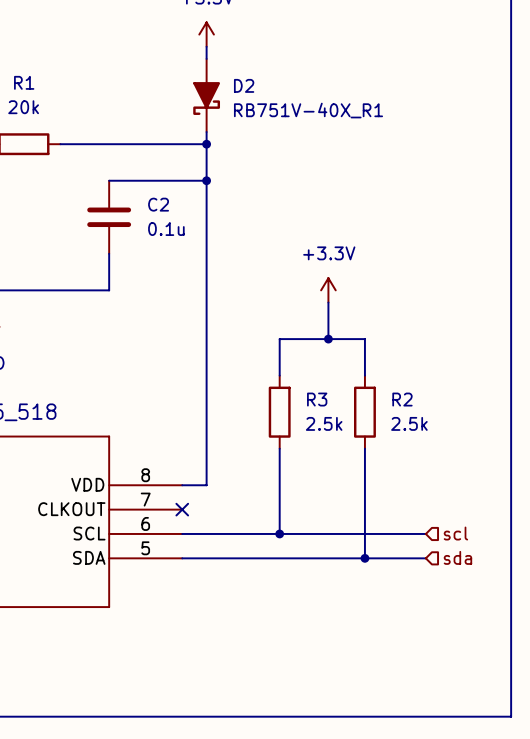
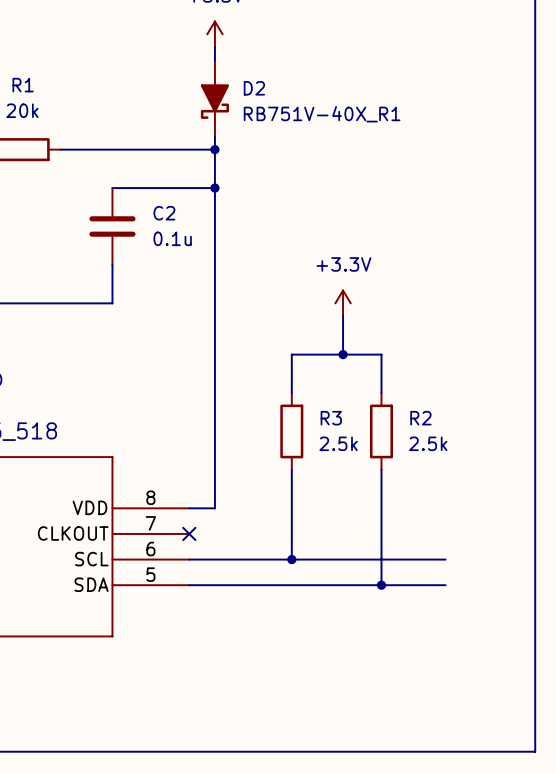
hierarchical label: scl (455, 533) -> none
hierarchical label: sda (457, 557) -> none

